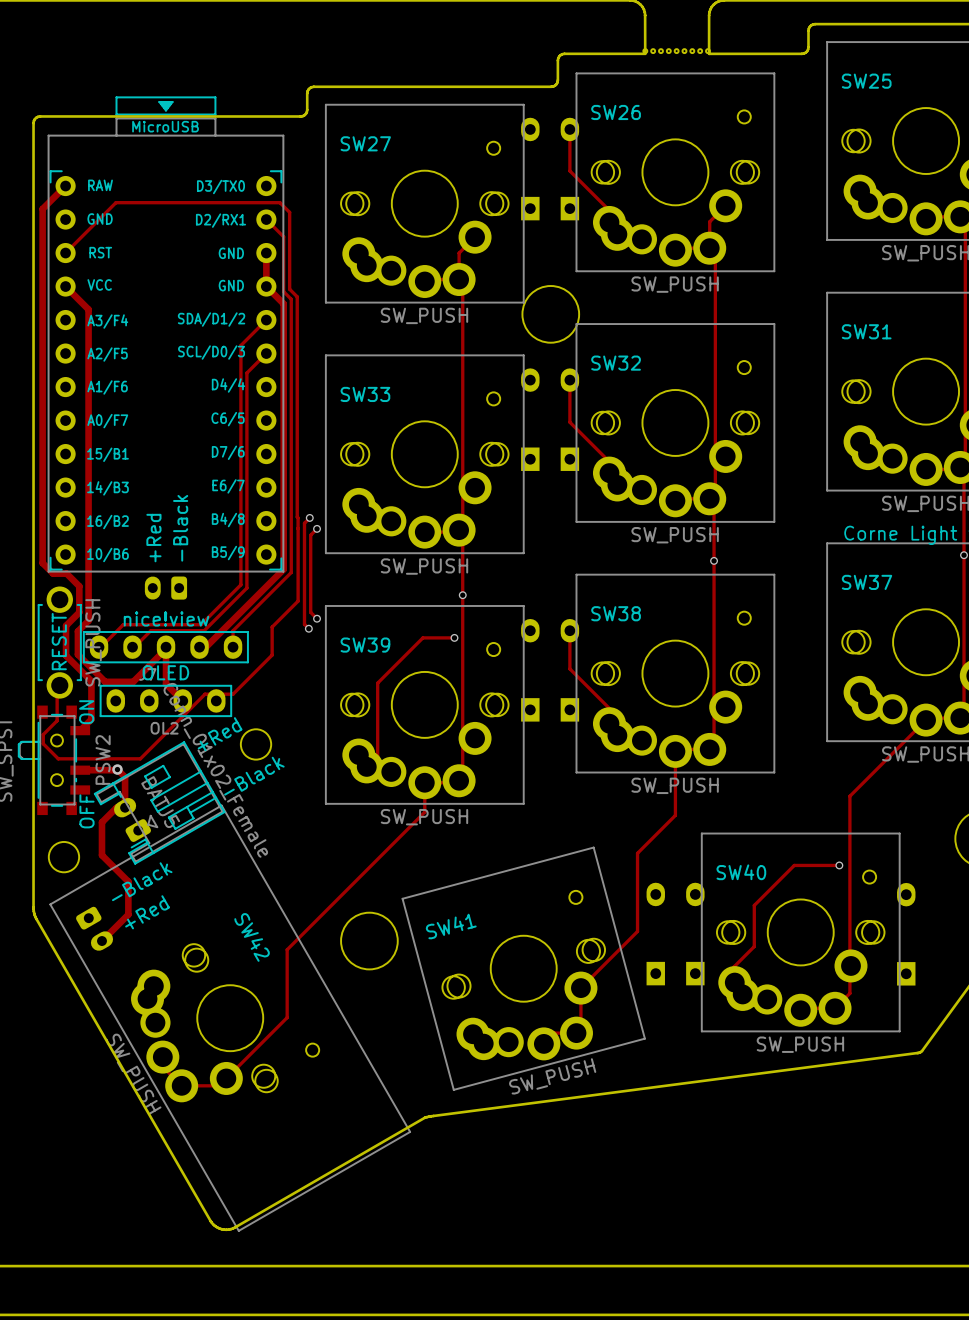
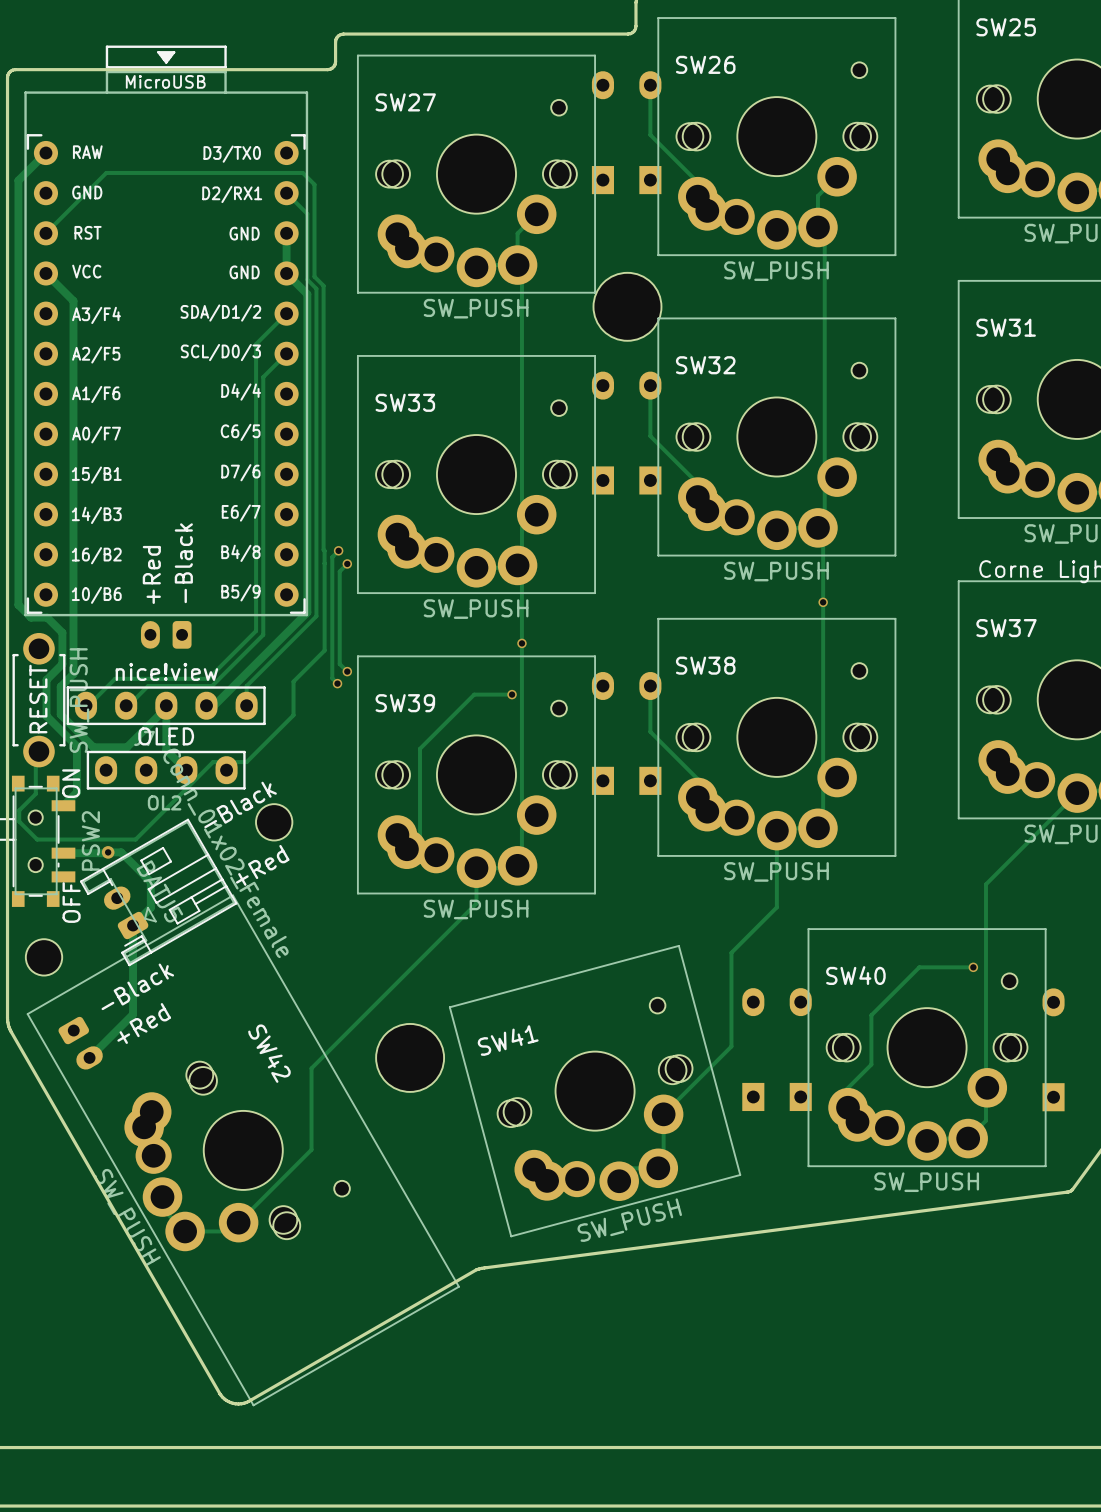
text: +Red (220, 734) -> -Black (240, 805)
track: (117, 769) (125, 777) (125, 807) (116, 807) (101, 822) (101, 855) (128, 881) (128, 914) -> (108, 852) (121, 852) (150, 882) (150, 907) (133, 925) (133, 1014) (121, 1026)
text: -Black (254, 776) -> +Red (262, 865)

